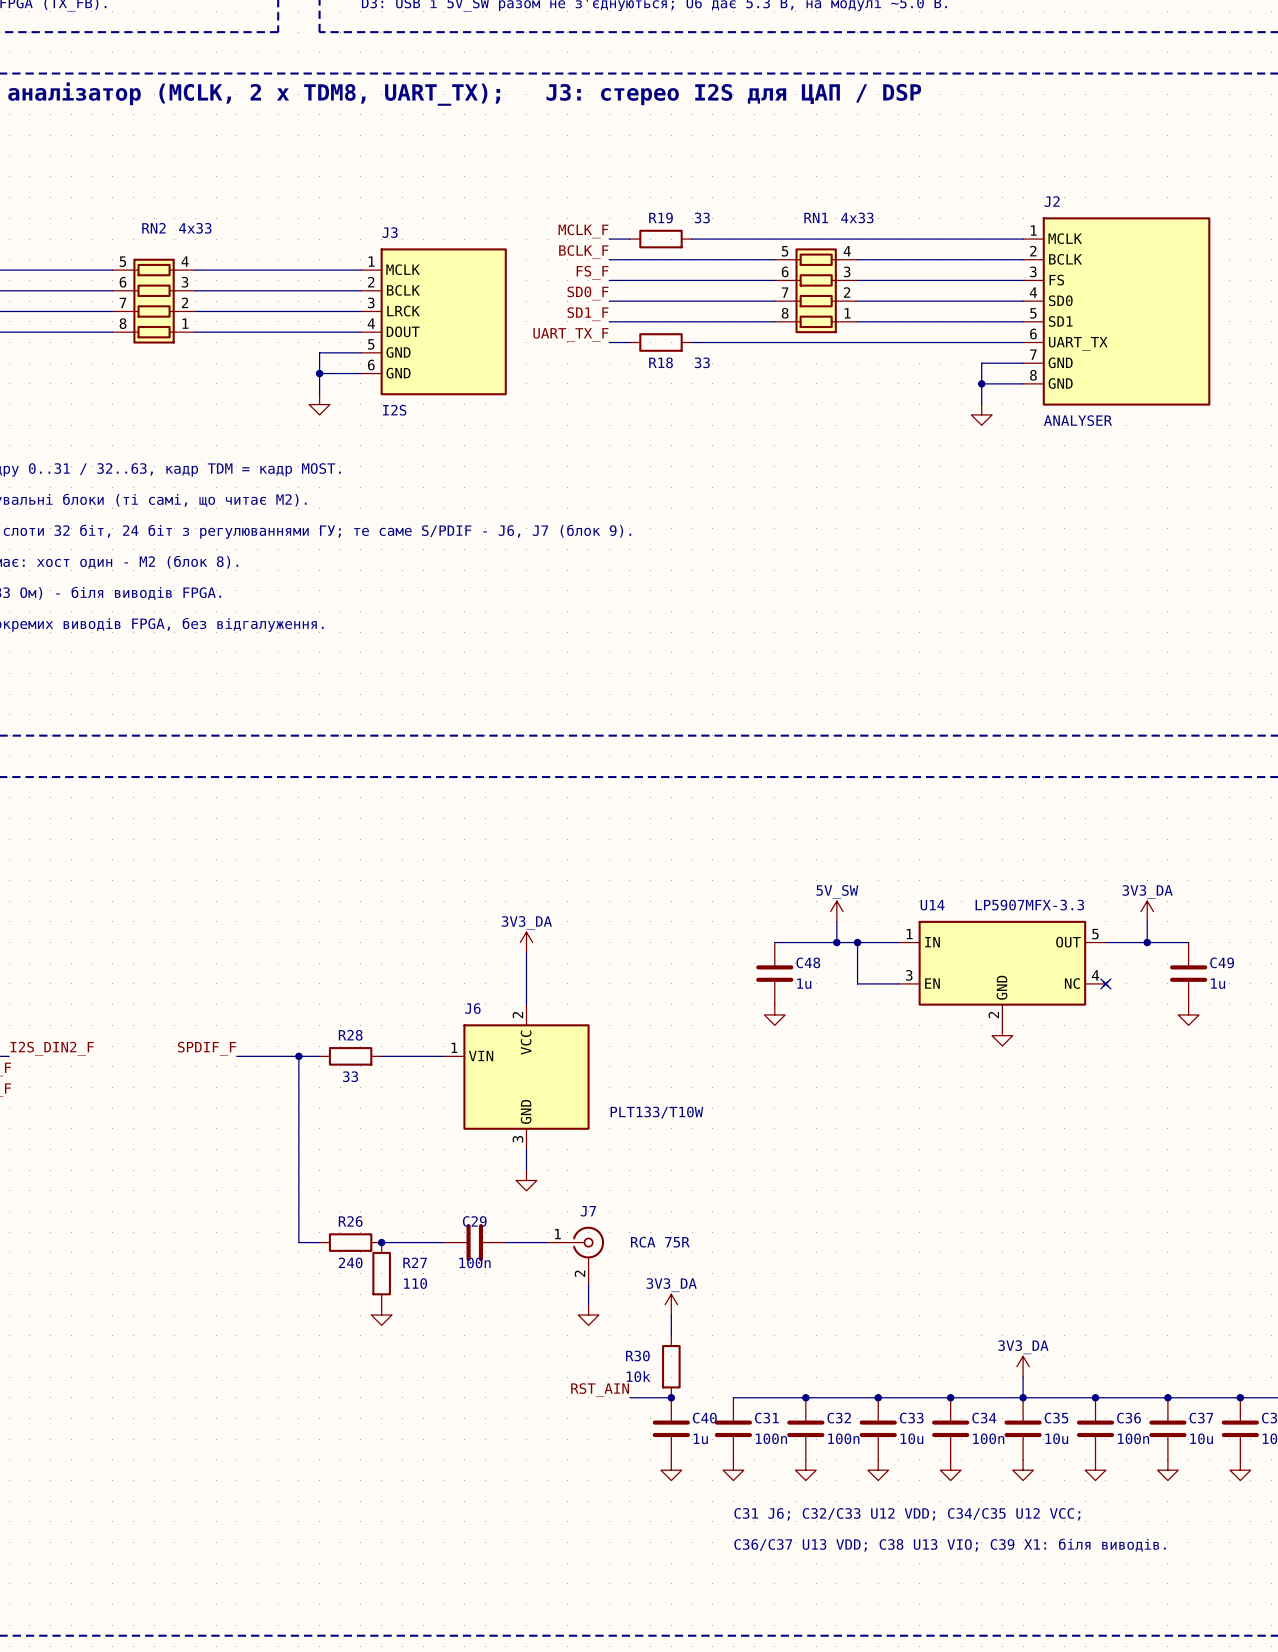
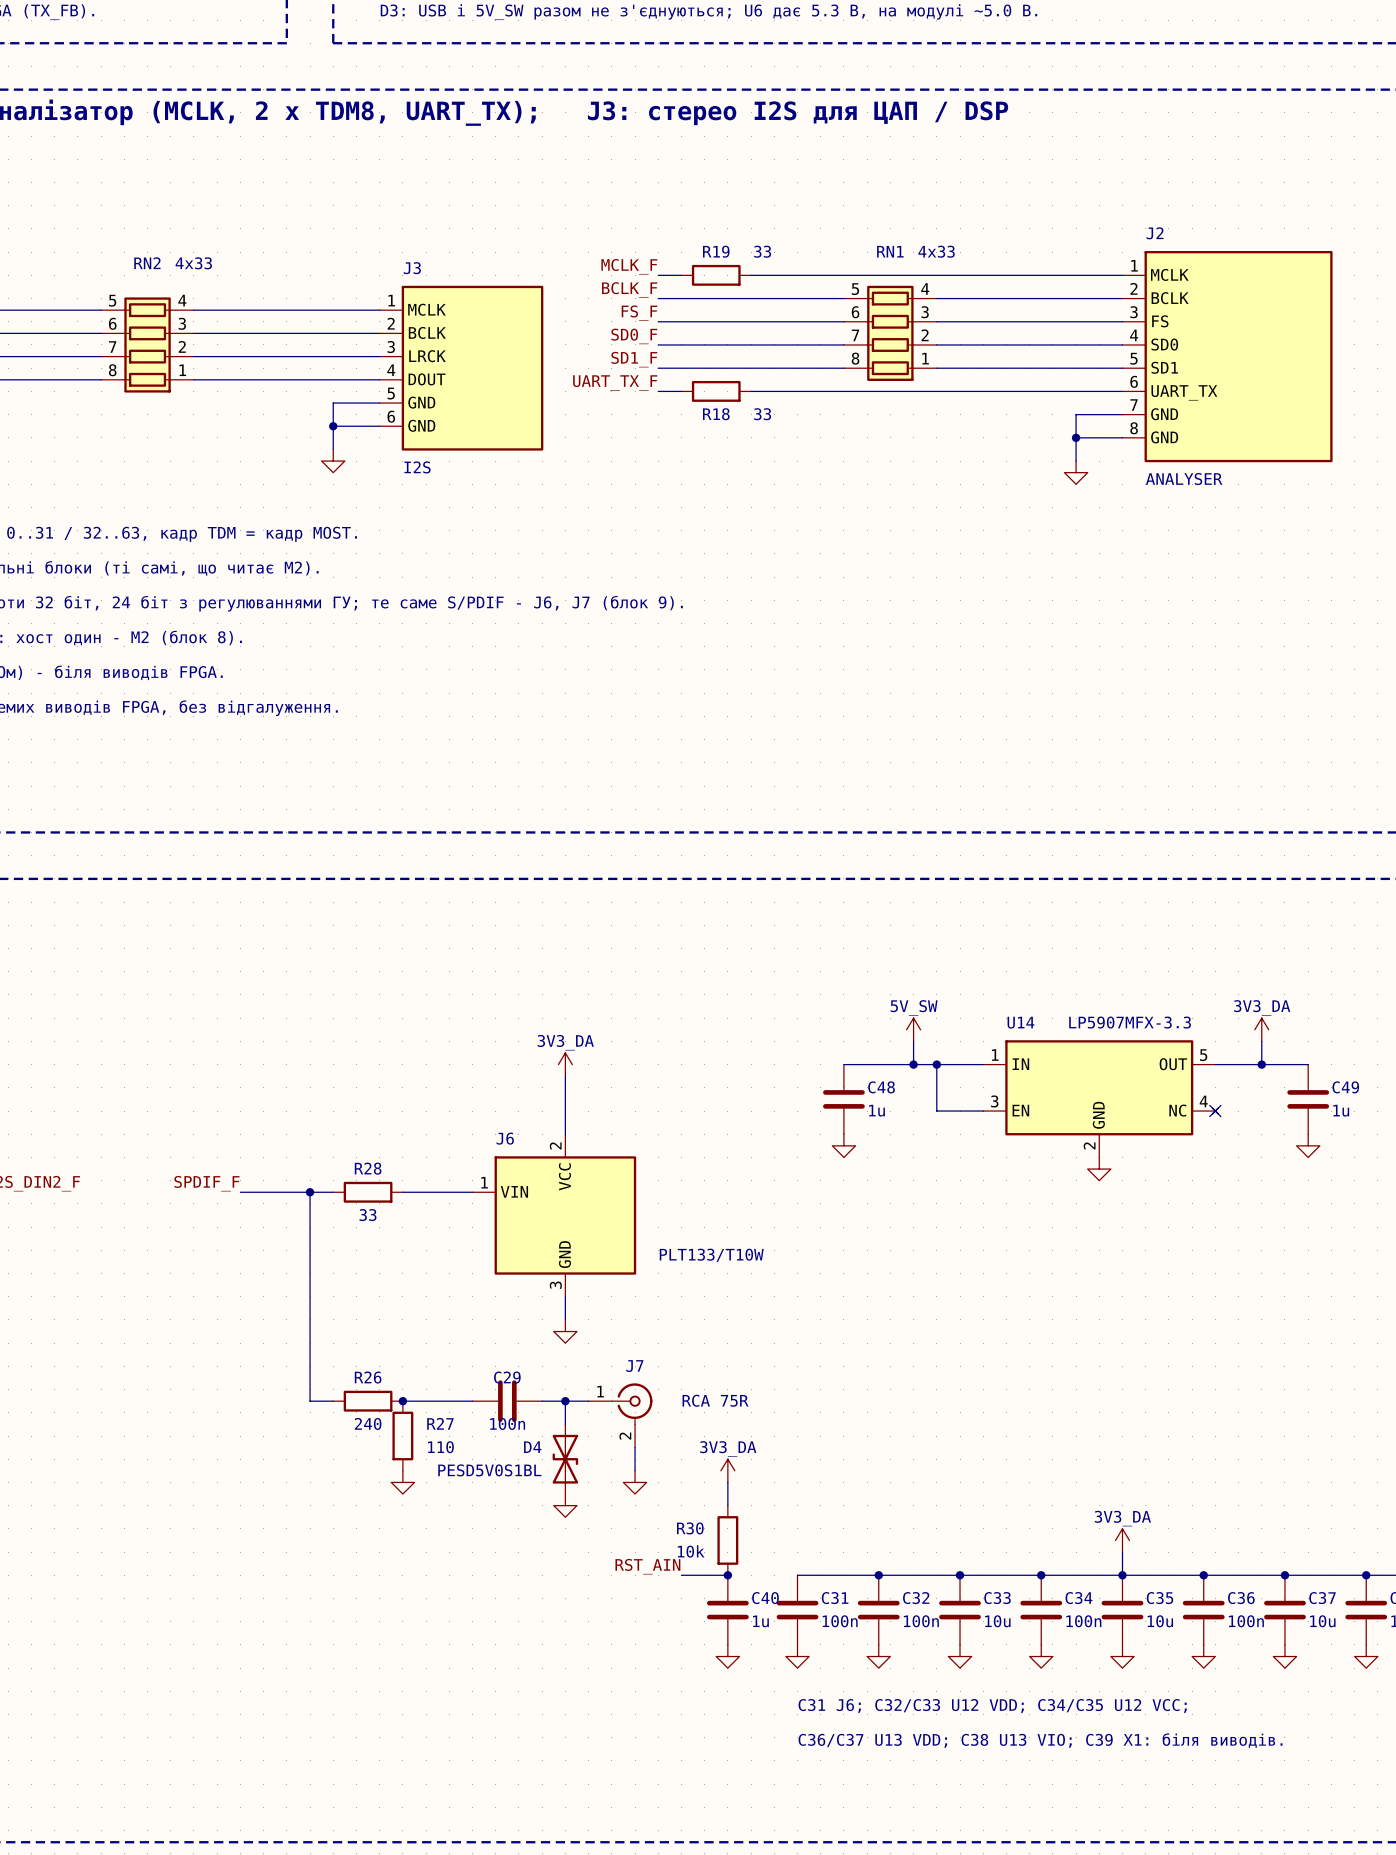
wire: none -> (565, 1401) (565, 1424)
junction: none -> (565, 1401)
D4: none -> PESD5V0S1BL (565, 1459)
power symbol: none -> (565, 1505)

